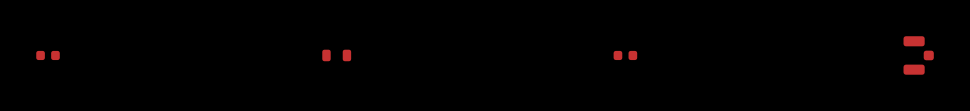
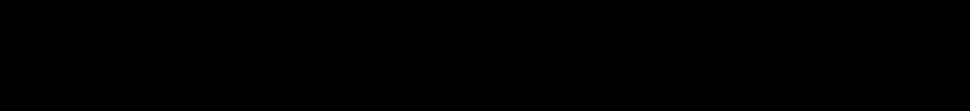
part: (48, 55) -> none
part: (336, 55) -> none
part: (625, 55) -> none
part: (918, 55) -> none

